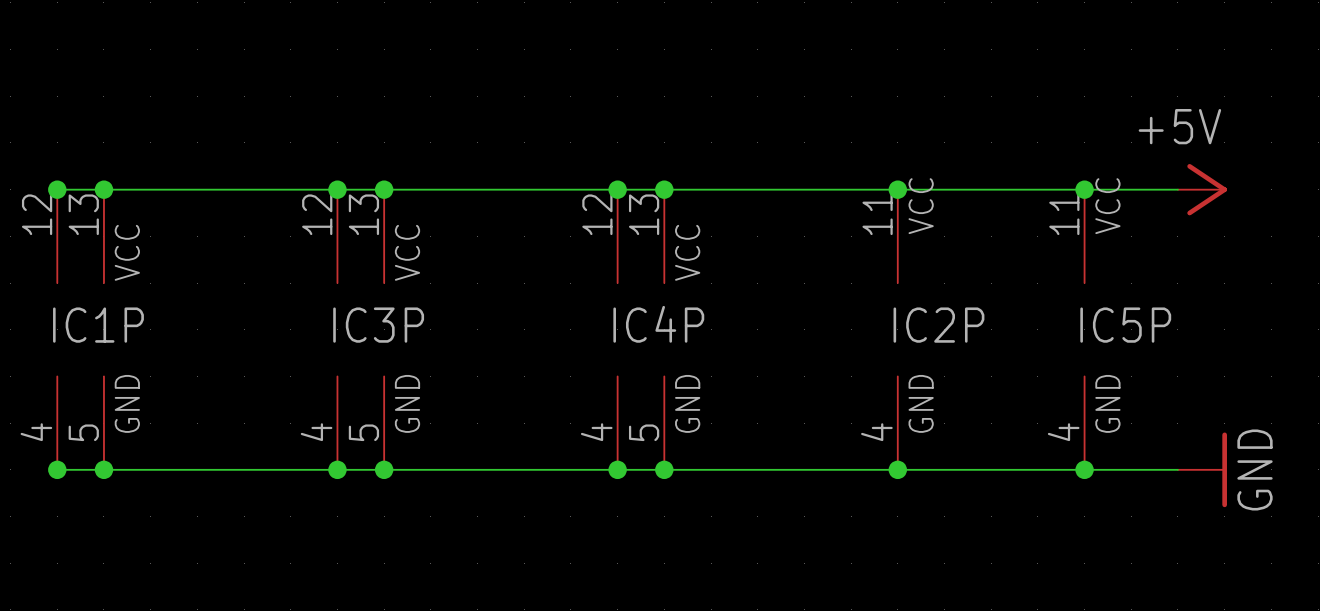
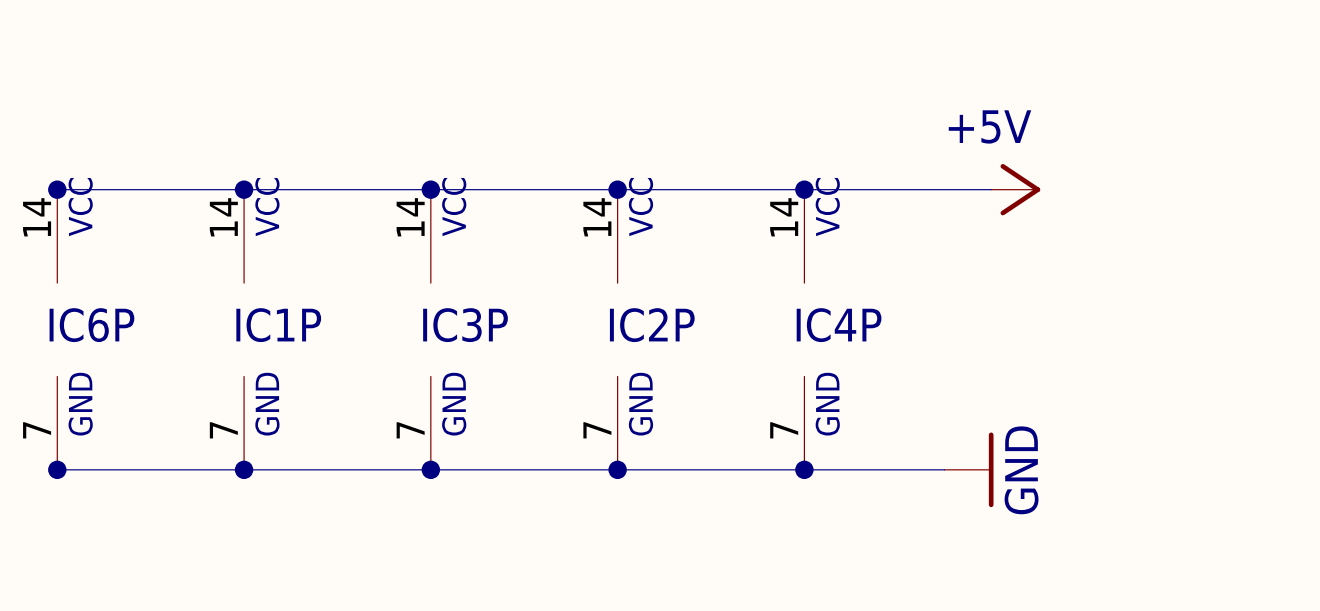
IC1P symbol: [57, 189, 104, 470] -> [244, 189, 245, 470]
junction: (103, 189) -> none
junction: none -> (244, 189)
IC3P symbol: [337, 189, 385, 470] -> [430, 189, 431, 470]
junction: (337, 189) -> none
junction: (384, 189) -> none
junction: none -> (430, 189)
IC4P symbol: [617, 189, 665, 470] -> [804, 189, 805, 470]
junction: (664, 189) -> none
junction: none -> (804, 189)
junction: (897, 189) -> none
wire: (991, 189) (1177, 189) -> none
junction: (1084, 189) -> none
power symbol position: +5V (1202, 189) -> +5V (1015, 189)
IC2P pin number: 11 (877, 214) -> 14 (597, 217)
IC6P: none -> (57, 329)
IC2P position: (897, 329) -> (617, 329)
IC5P: (1084, 329) -> none
IC2P pin number: 4 (876, 432) -> 7 (597, 430)
junction: (103, 469) -> none
junction: none -> (244, 469)
junction: (337, 469) -> none
junction: (384, 469) -> none
junction: none -> (430, 469)
junction: (664, 469) -> none
junction: none -> (804, 469)
junction: (897, 469) -> none
wire: (944, 469) (1177, 469) -> none
junction: (1084, 469) -> none
power symbol position: GND (1202, 469) -> GND (969, 469)

